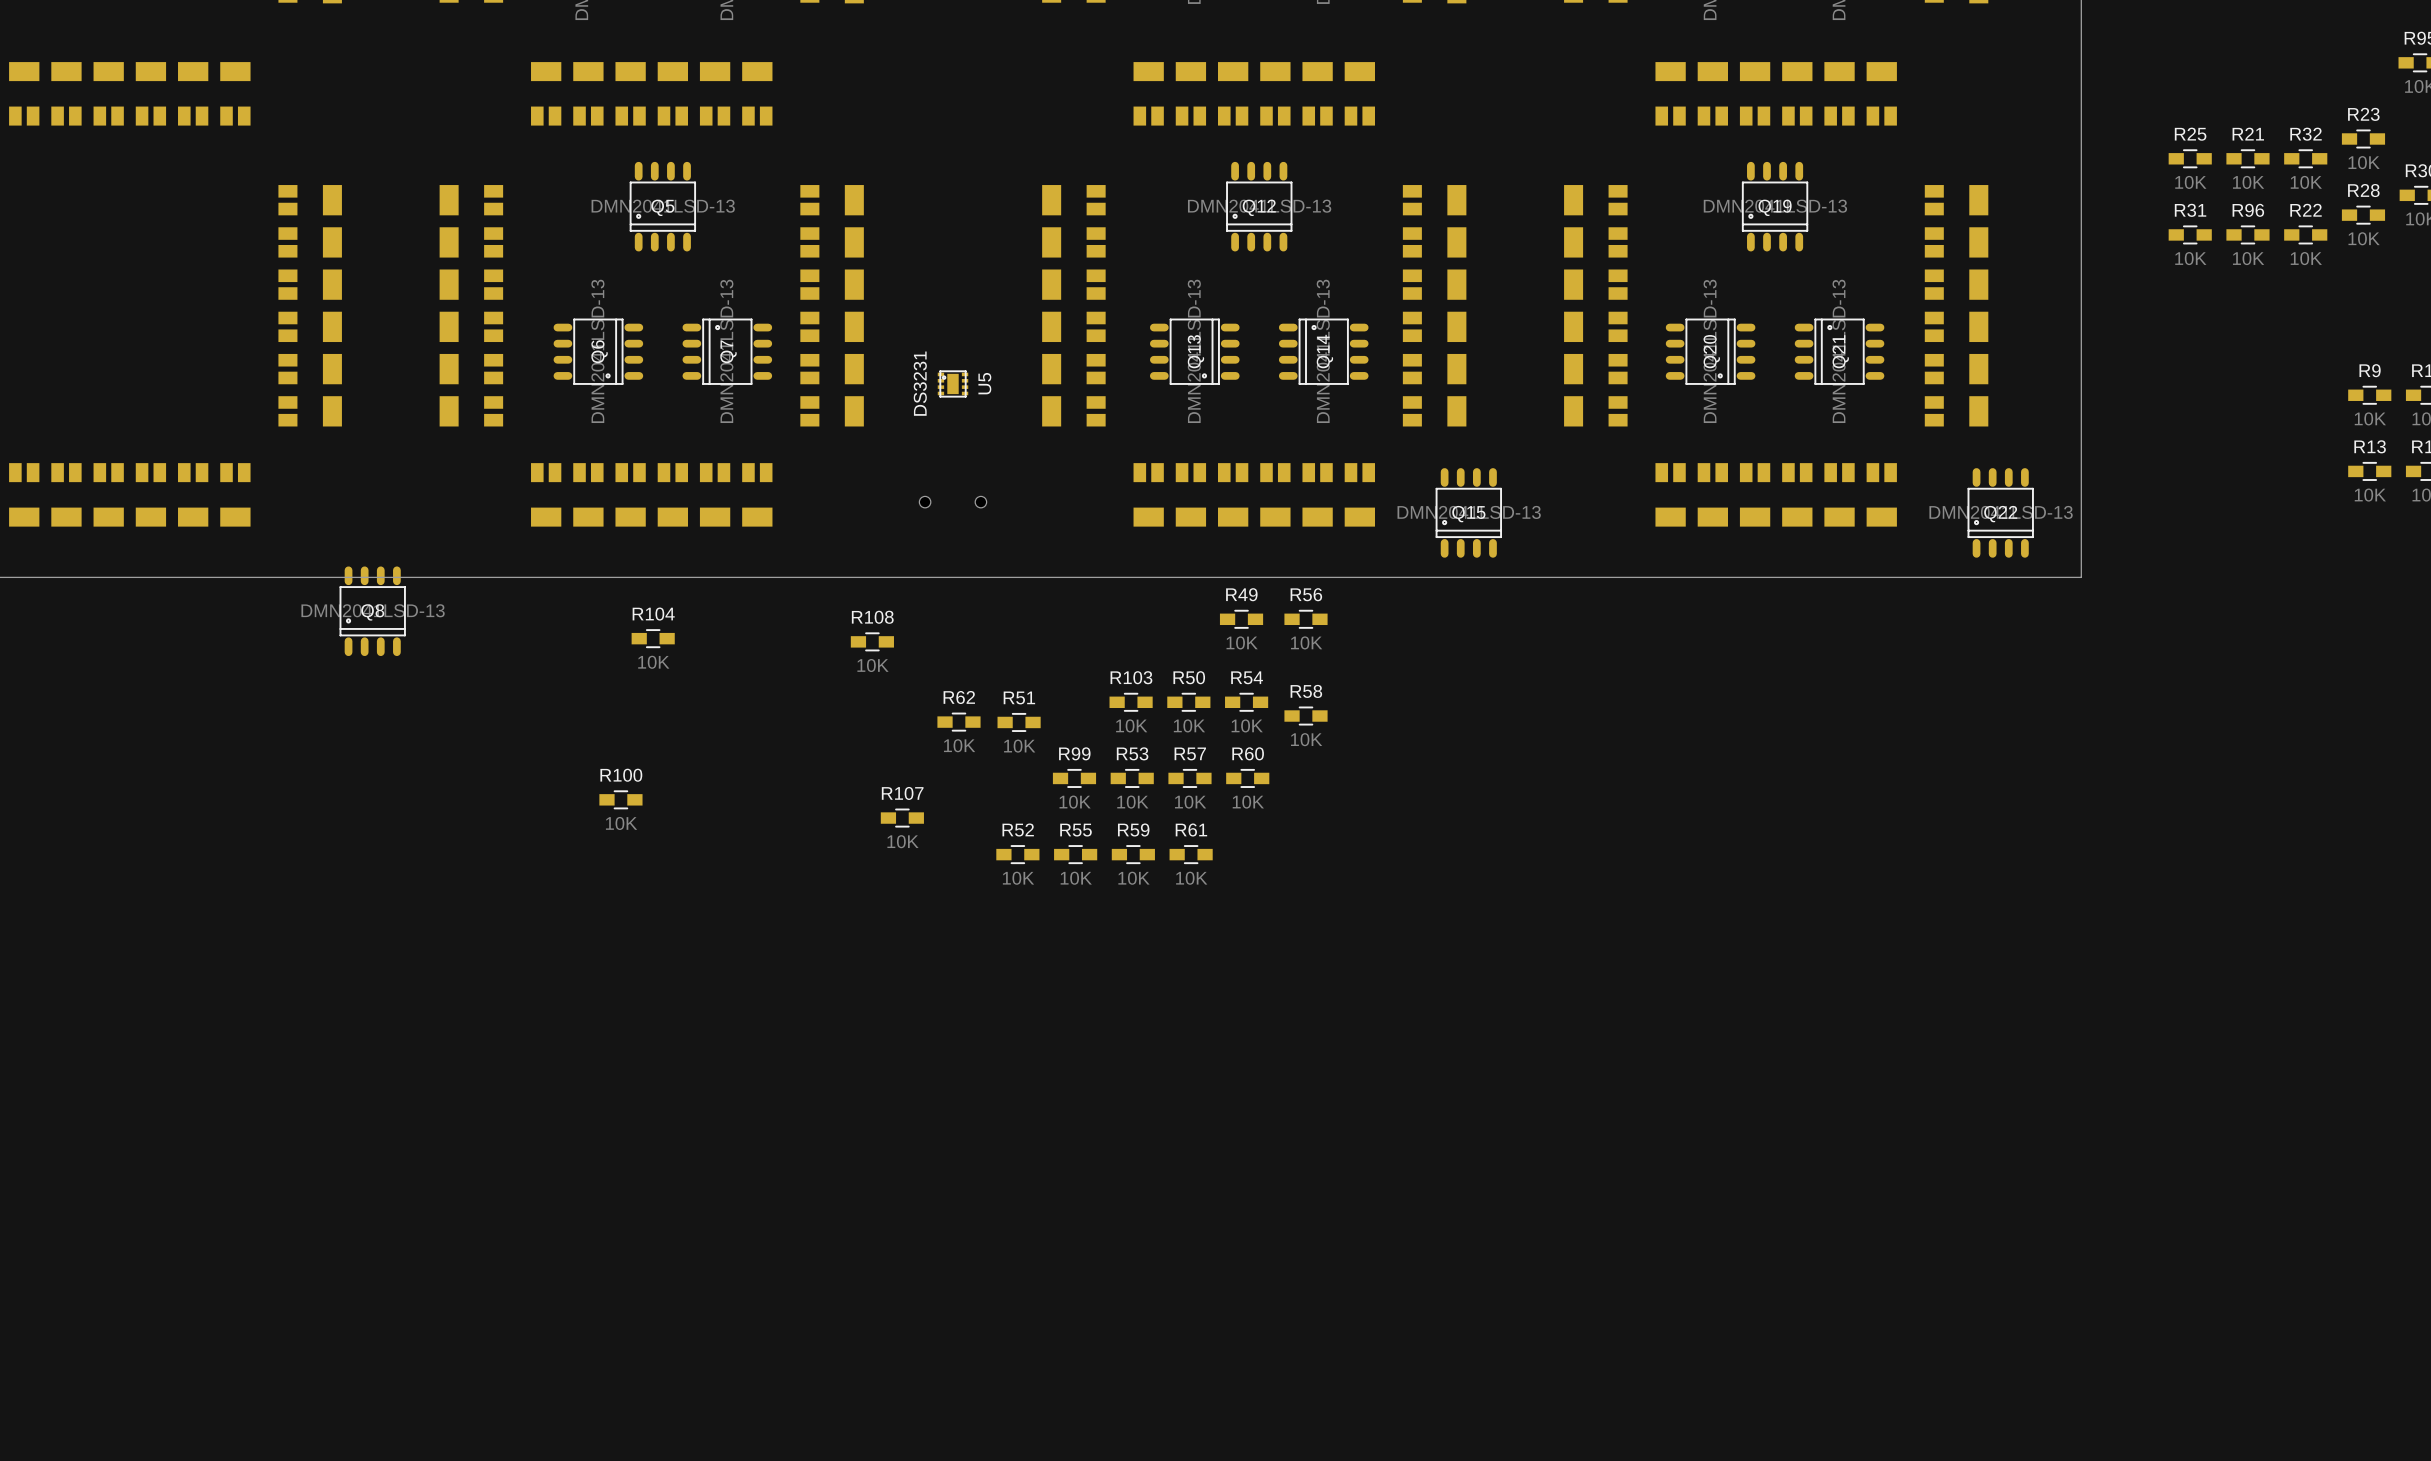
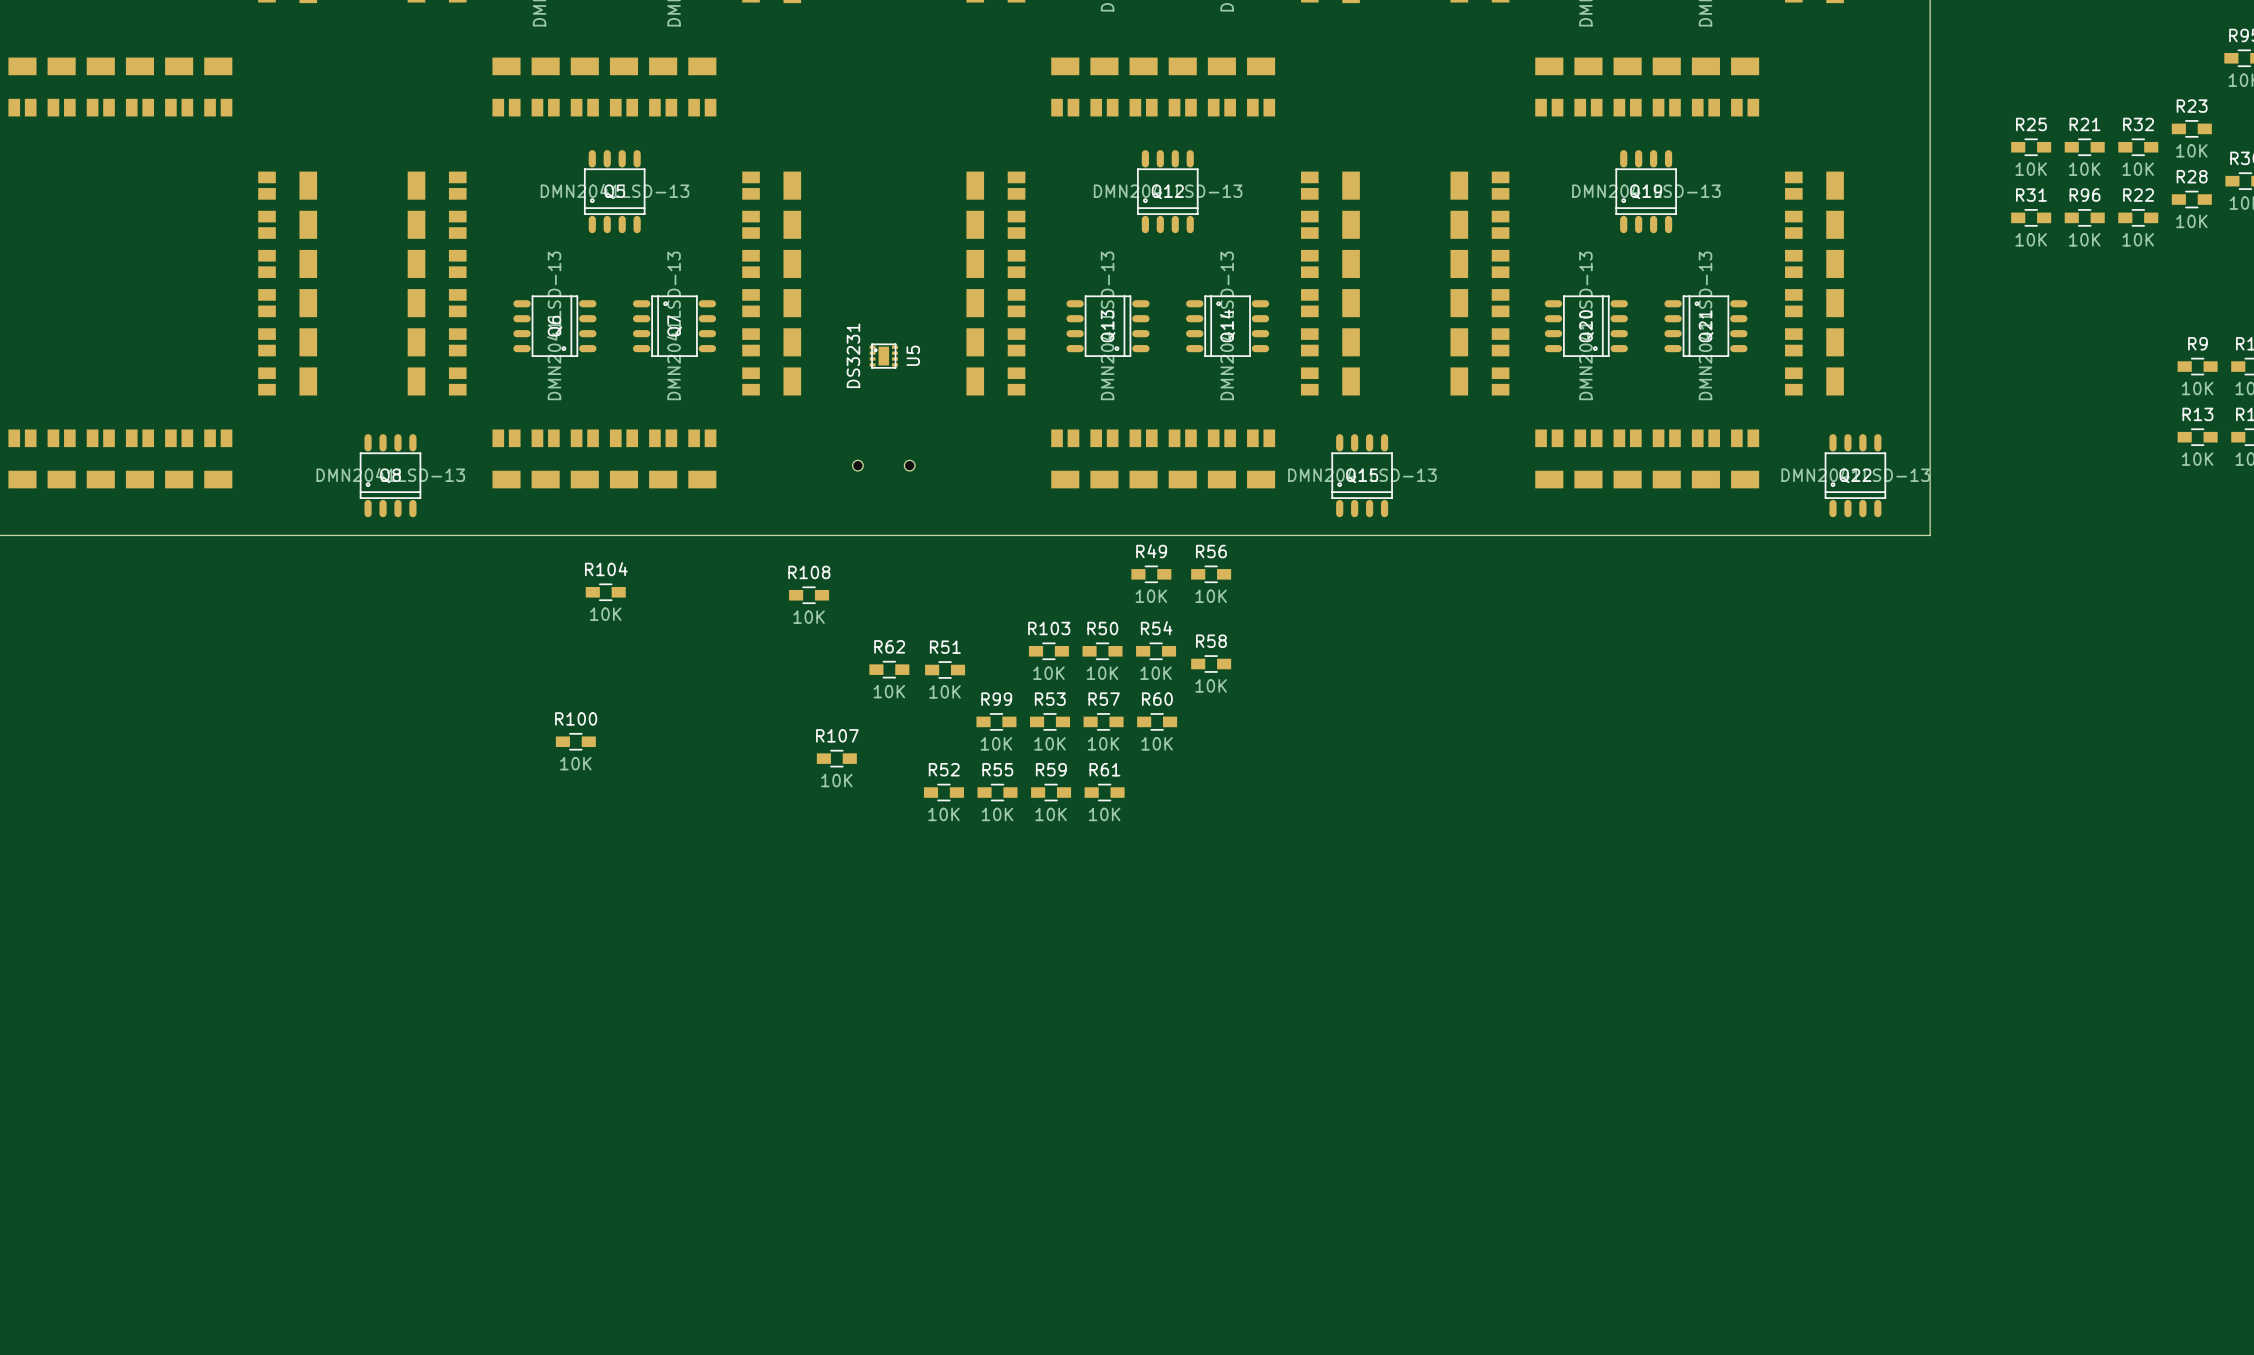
Q8 position: (372, 611) -> (390, 475)

